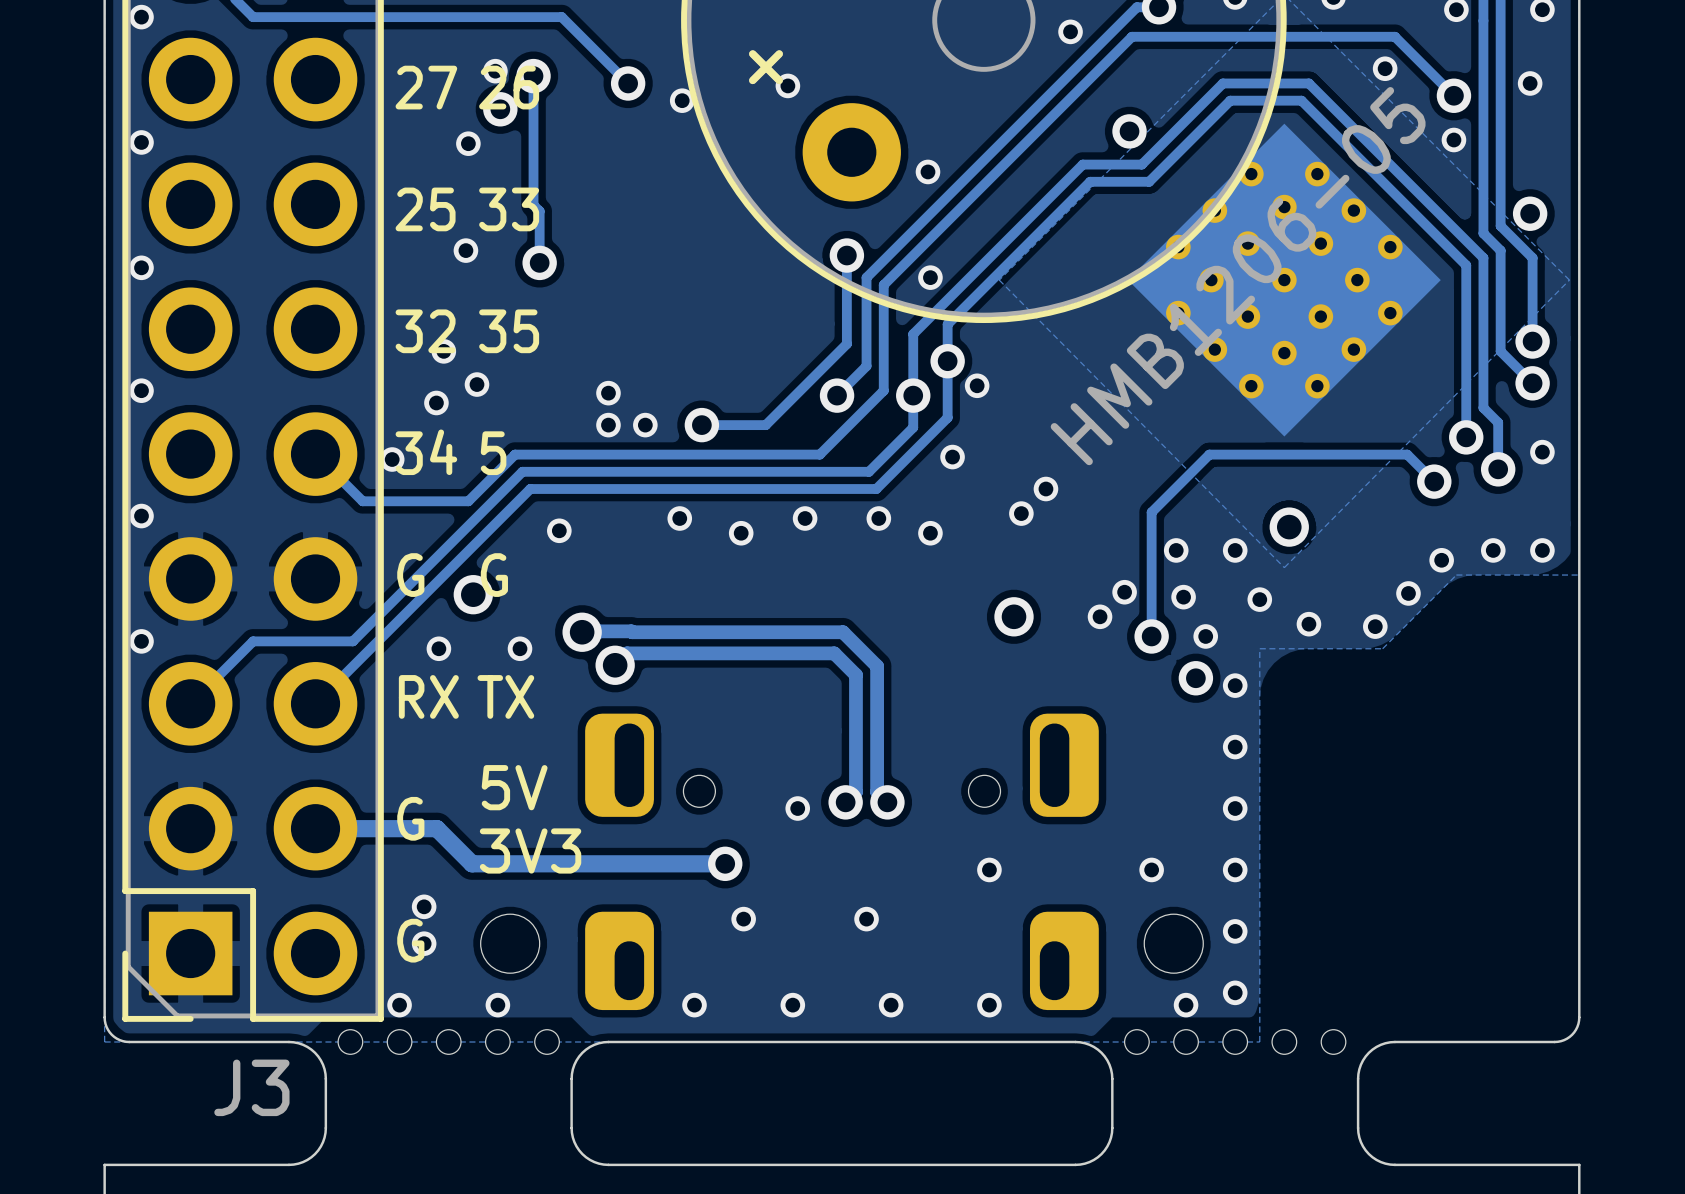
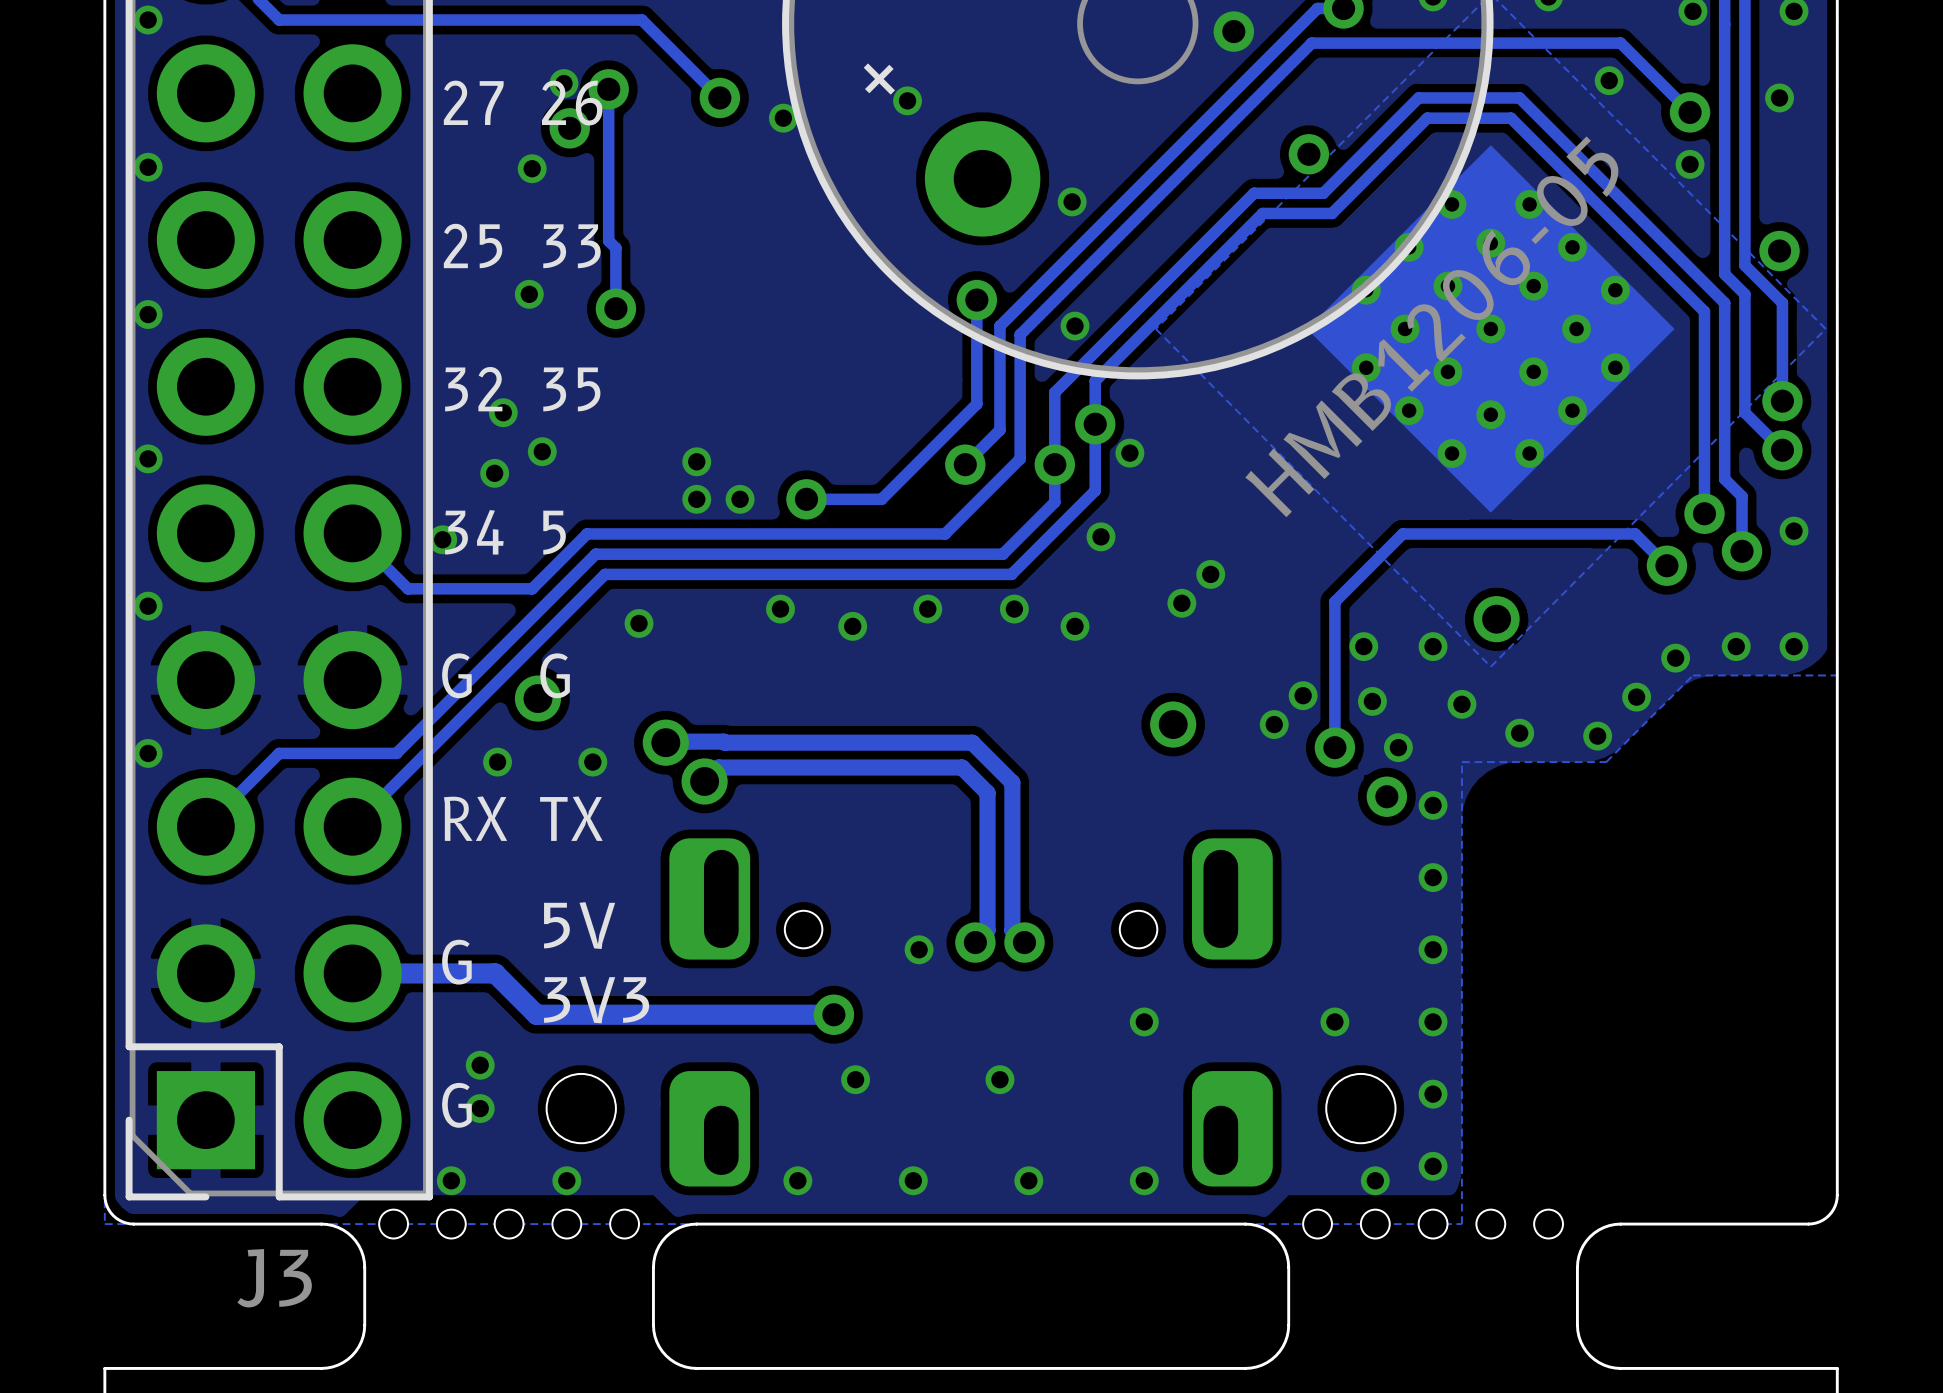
via size: [1058, 19, 1083, 45] -> [1213, 11, 1255, 52]

